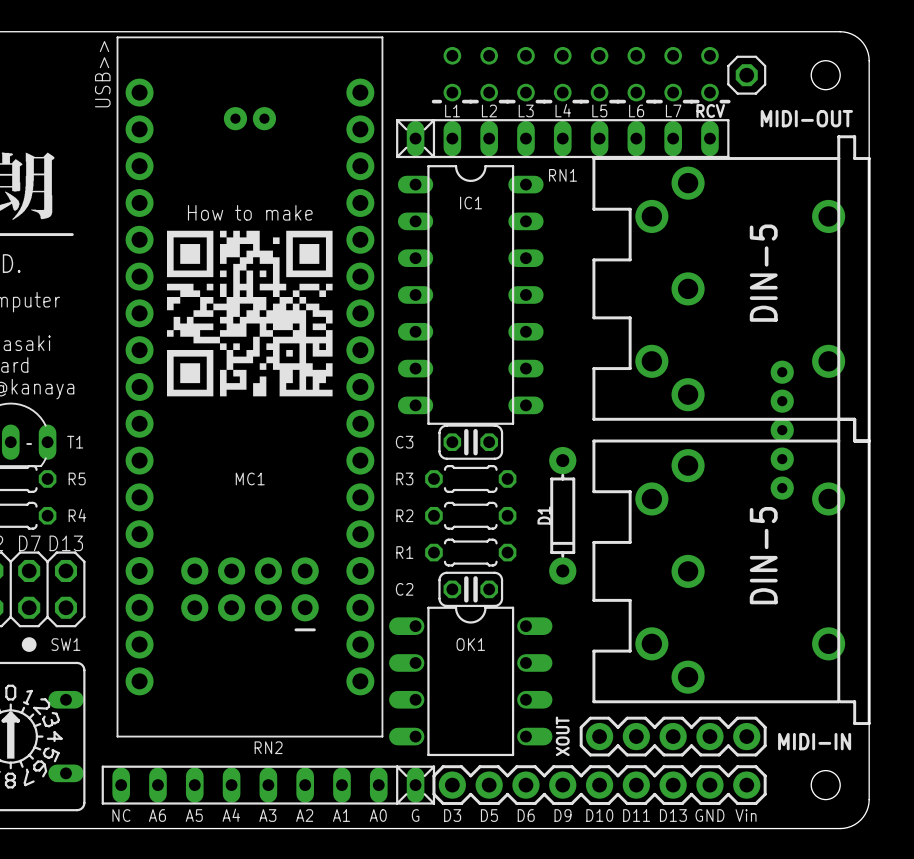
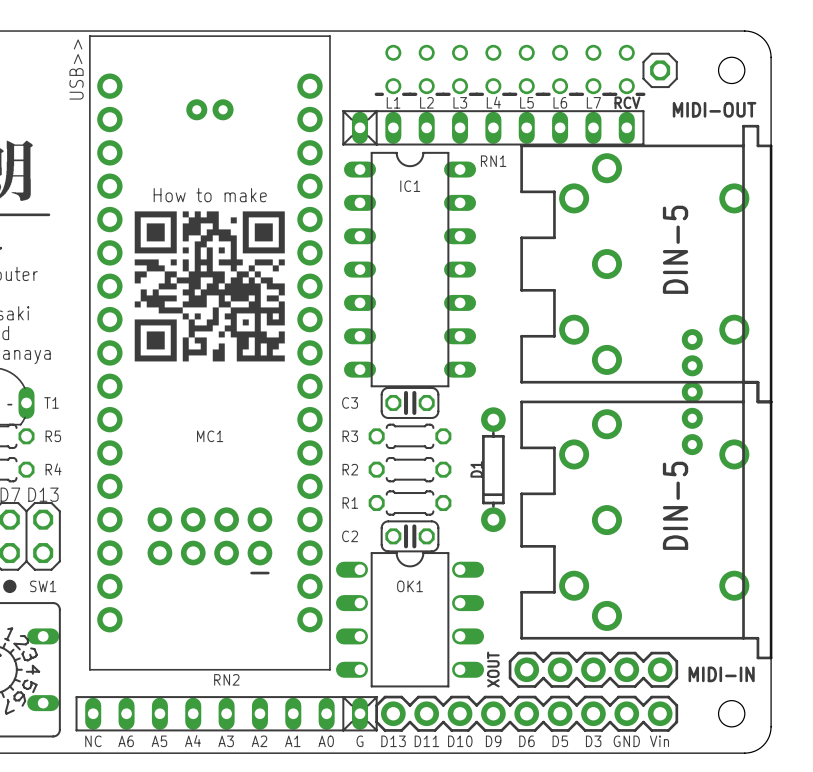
text: D3 (452, 815) -> D13 (393, 741)
text: D5 (489, 815) -> D11 (426, 741)
text: D6 (526, 815) -> D10 (460, 741)
text: D10 (599, 815) -> D6 (526, 741)
text: D11 (636, 815) -> D5 (560, 741)
text: D13 (673, 815) -> D3 (593, 741)

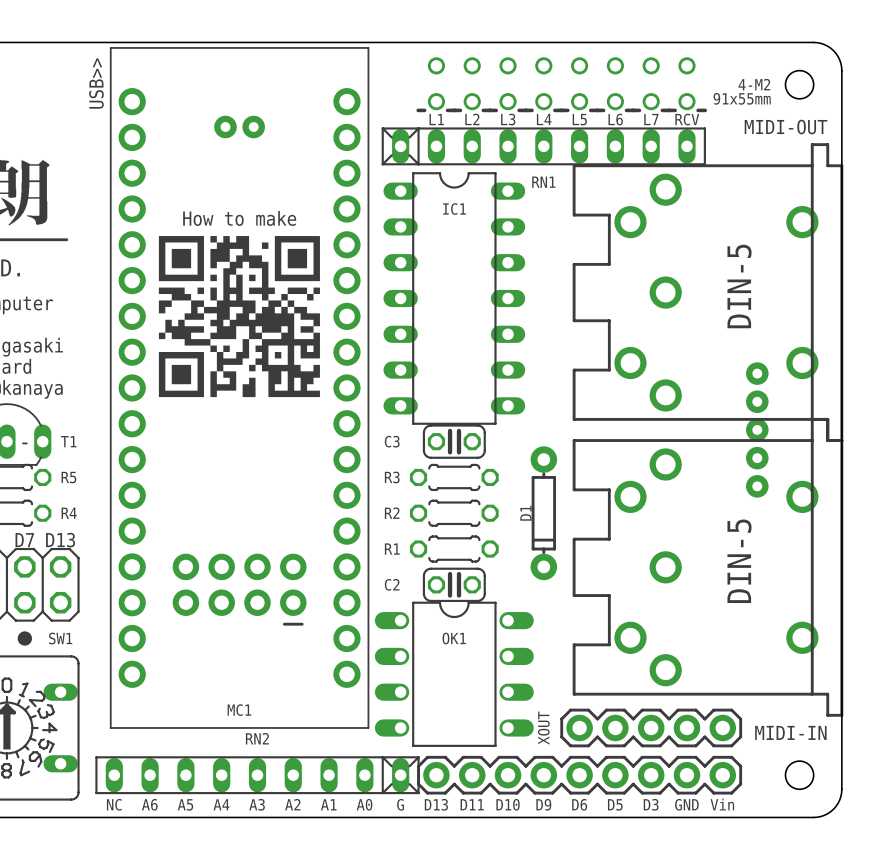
part: (660, 70) -> none
text: none -> 4-M2 (754, 84)
text: none -> 91x55mm (742, 98)
text position: MC1 (210, 436) -> MC1 (239, 710)

